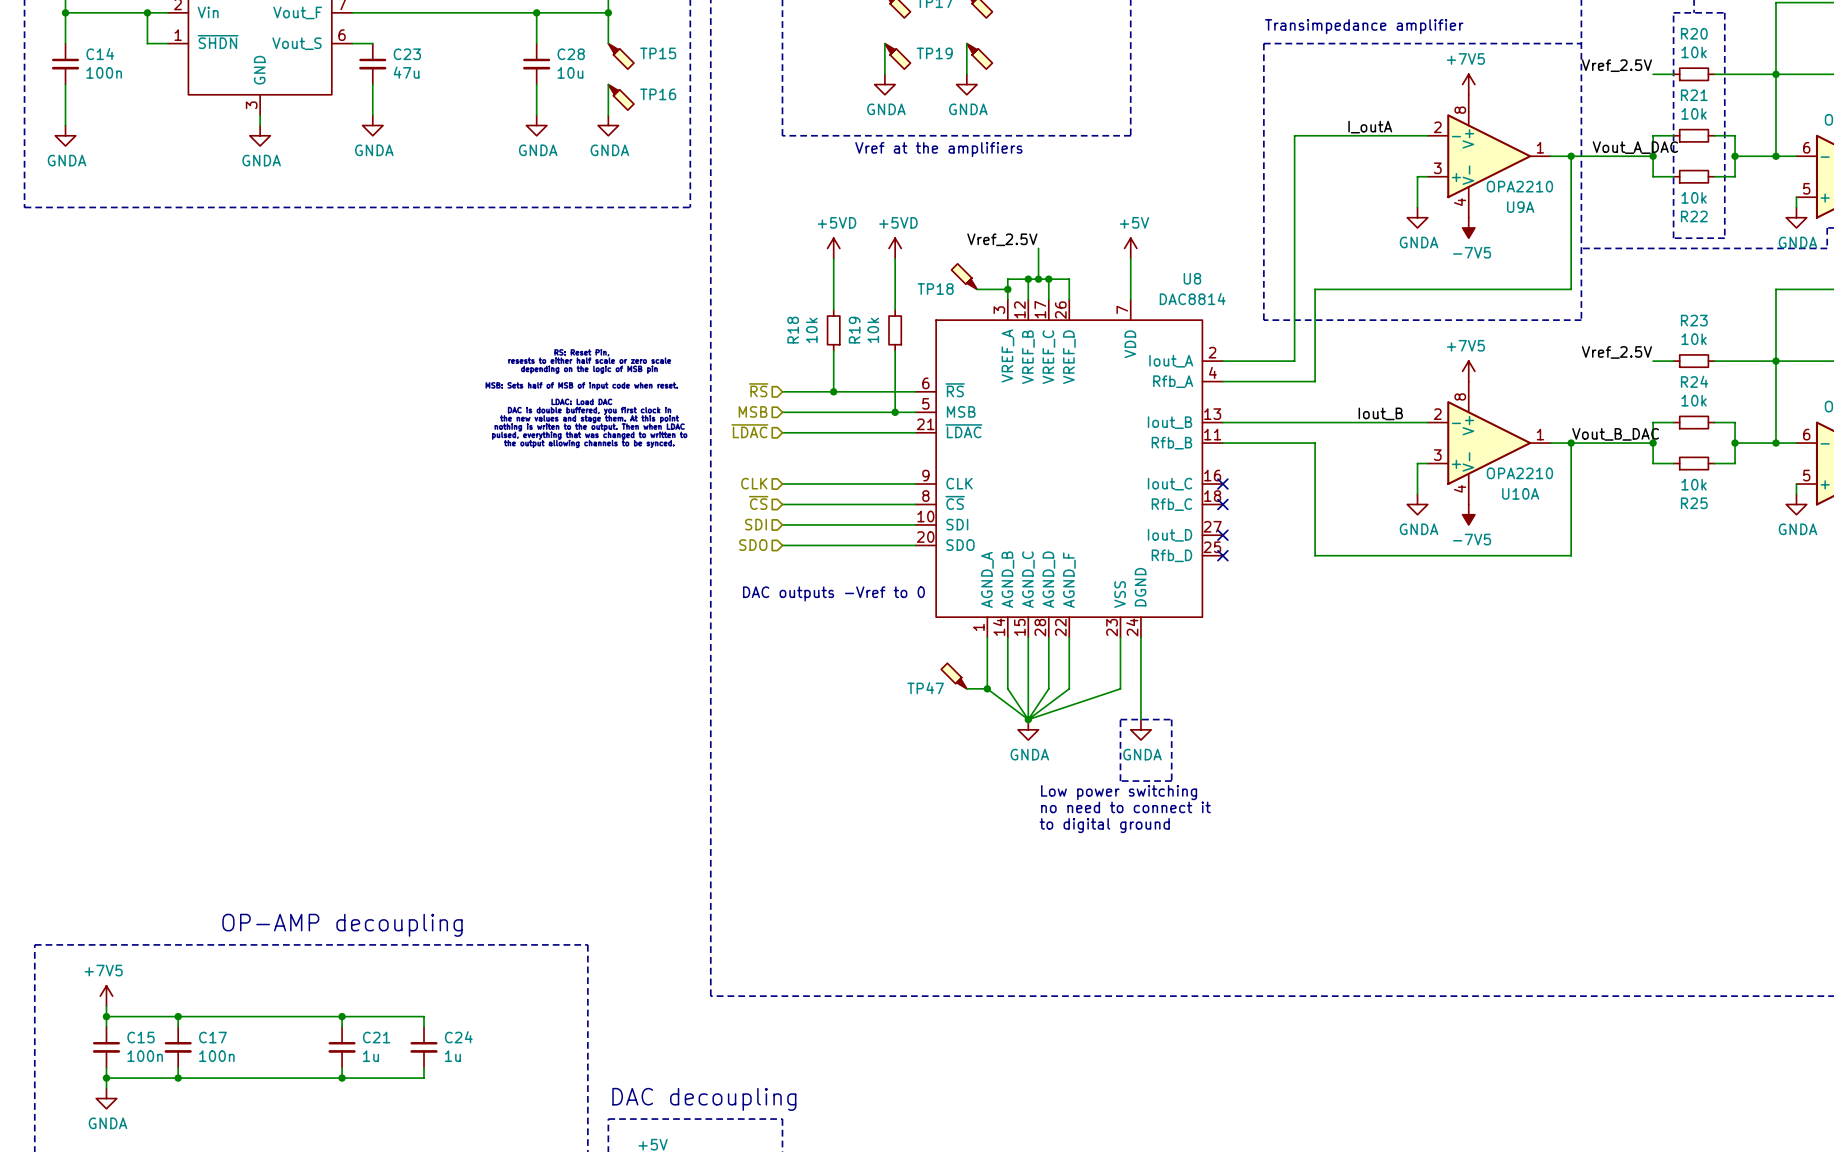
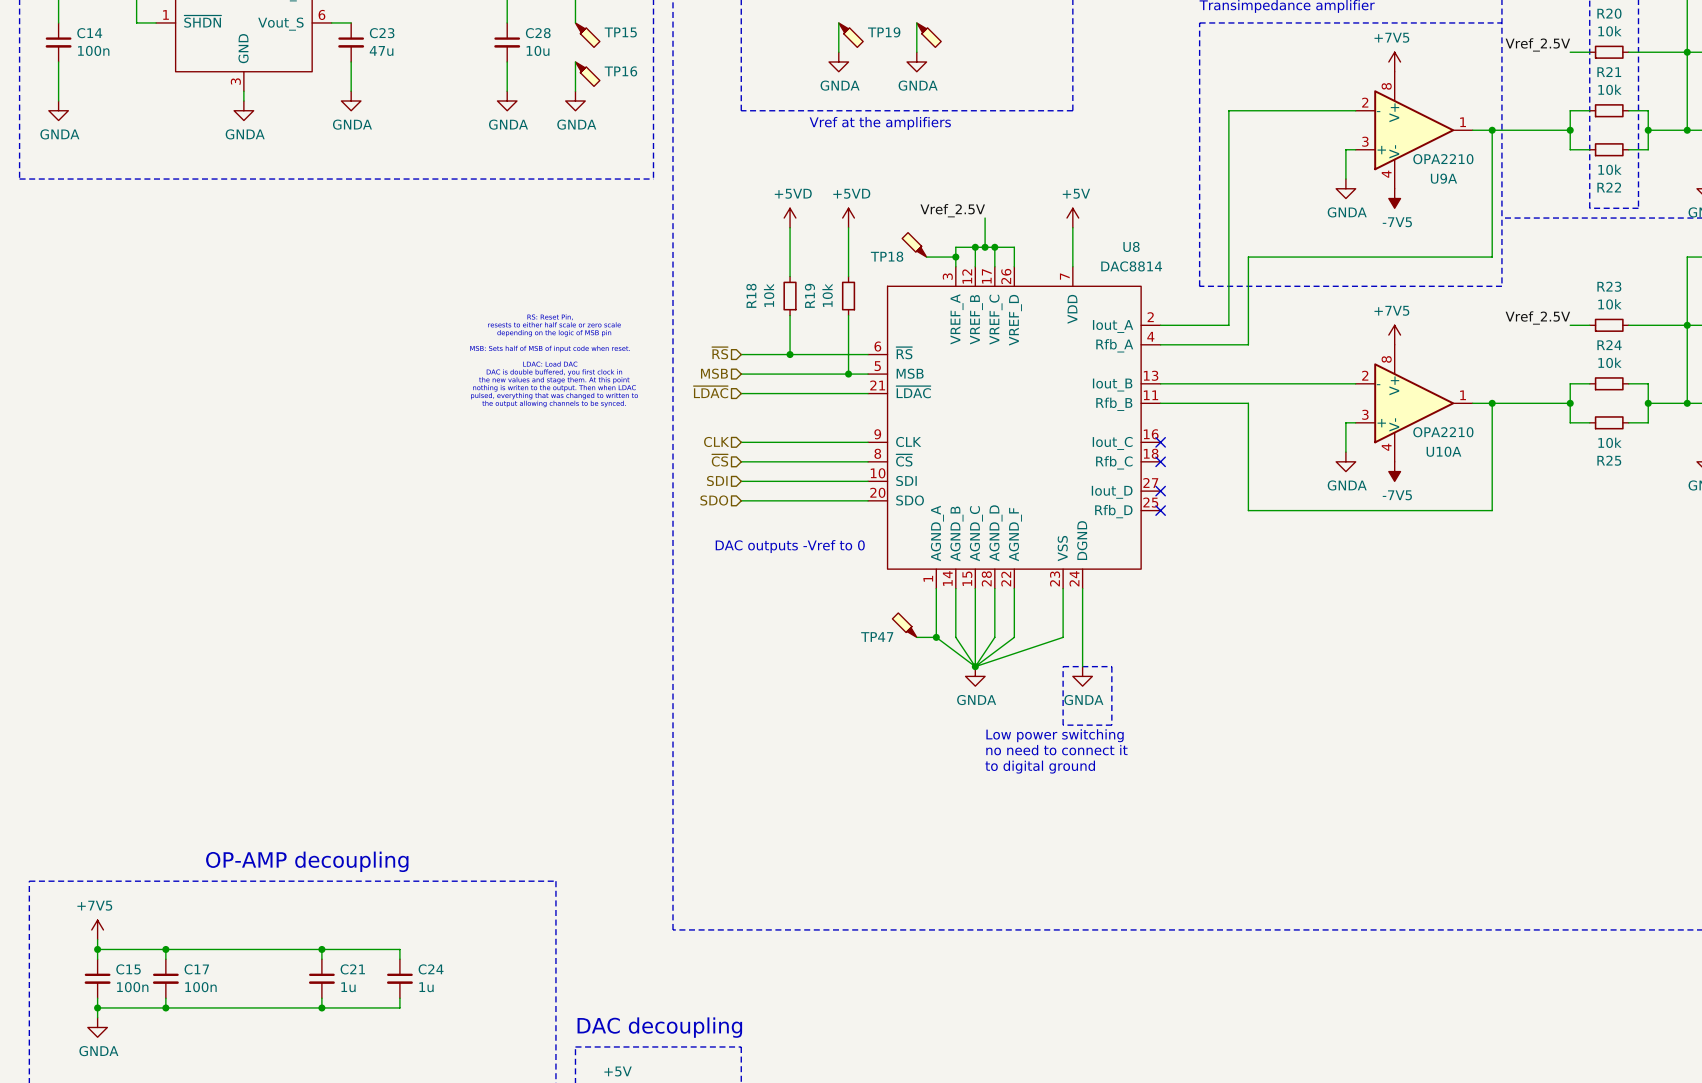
label: I_outA (1370, 127) -> none
label: Vout_A_DAC (1635, 147) -> none
label: Iout_B (1380, 413) -> none
label: Vout_B_DAC (1615, 434) -> none

